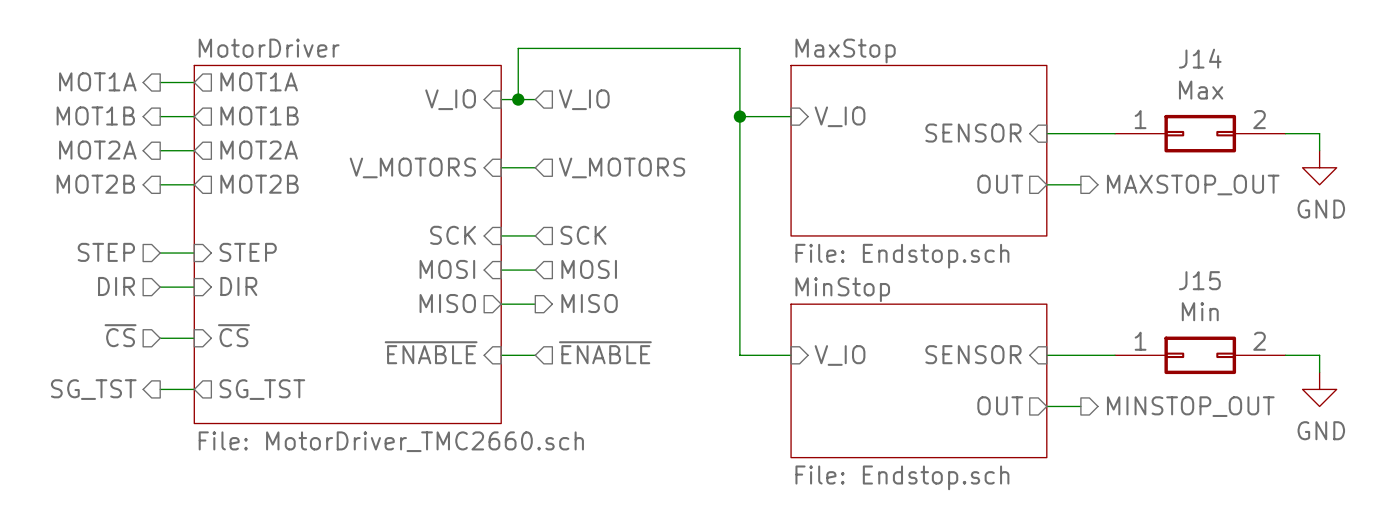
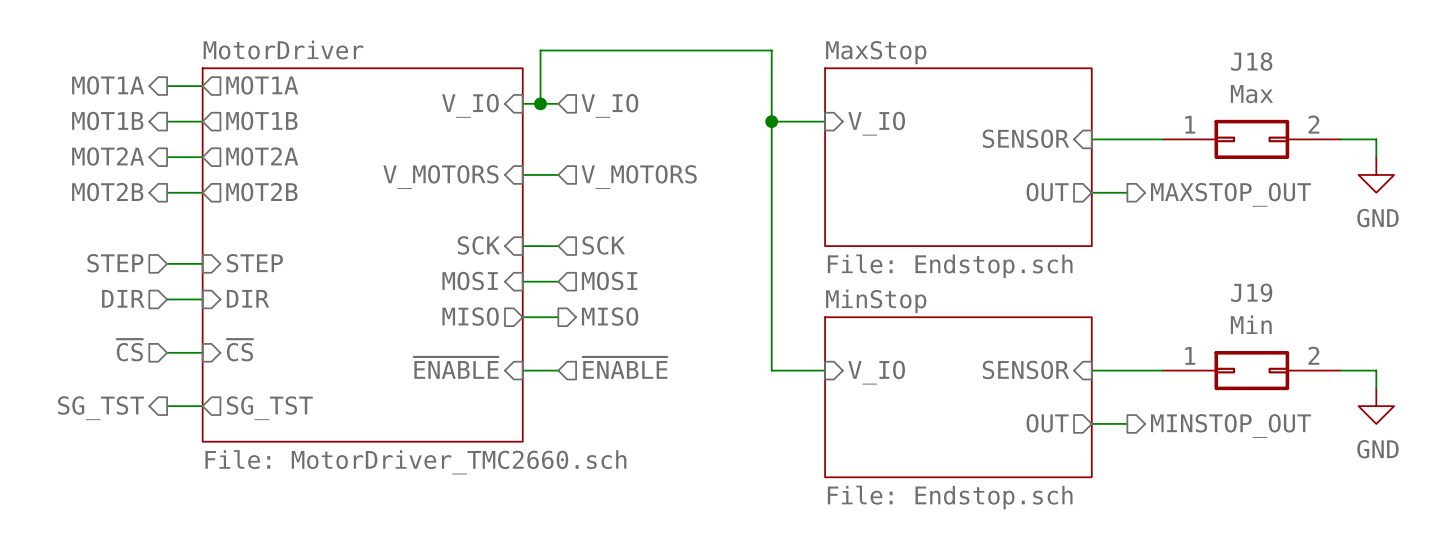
J14 name: J14 (1200, 58) -> J18 (1251, 61)
J15 name: J15 (1199, 280) -> J19 (1251, 292)

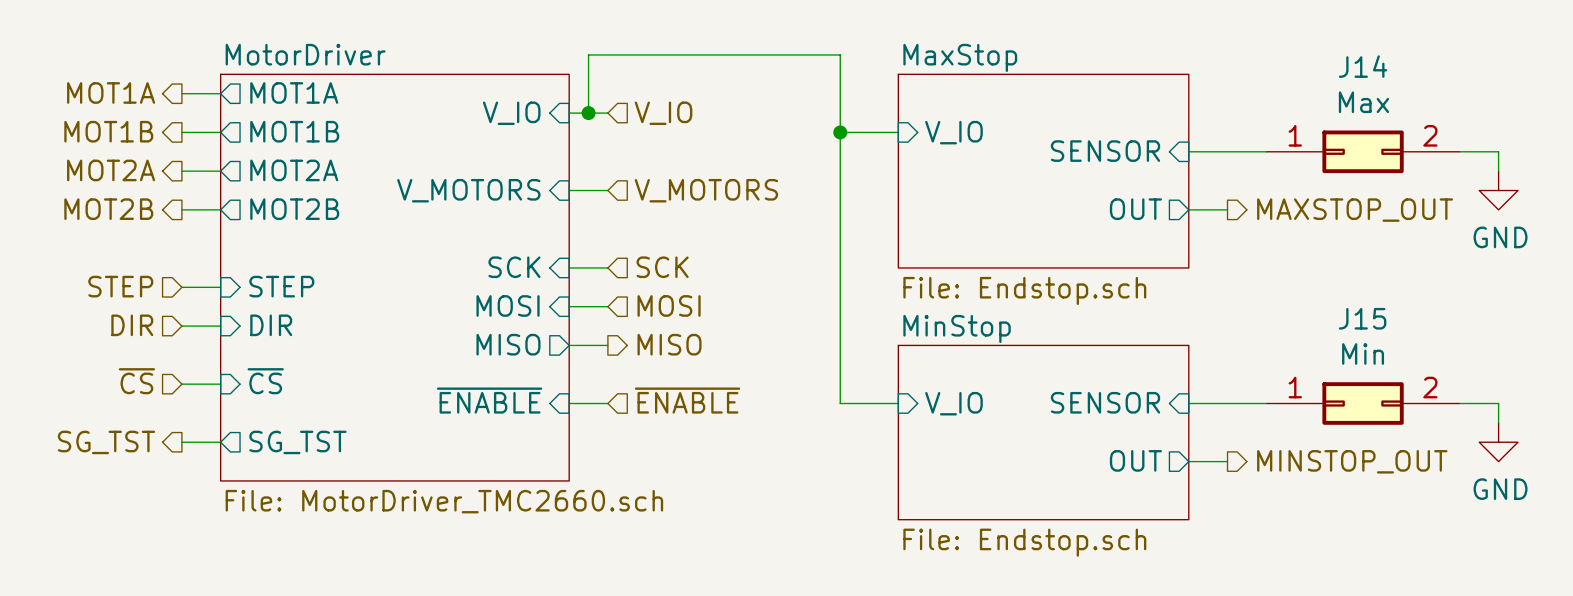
J18 name: J18 (1251, 61) -> J14 (1363, 66)
J19 name: J19 (1251, 292) -> J15 (1362, 318)

